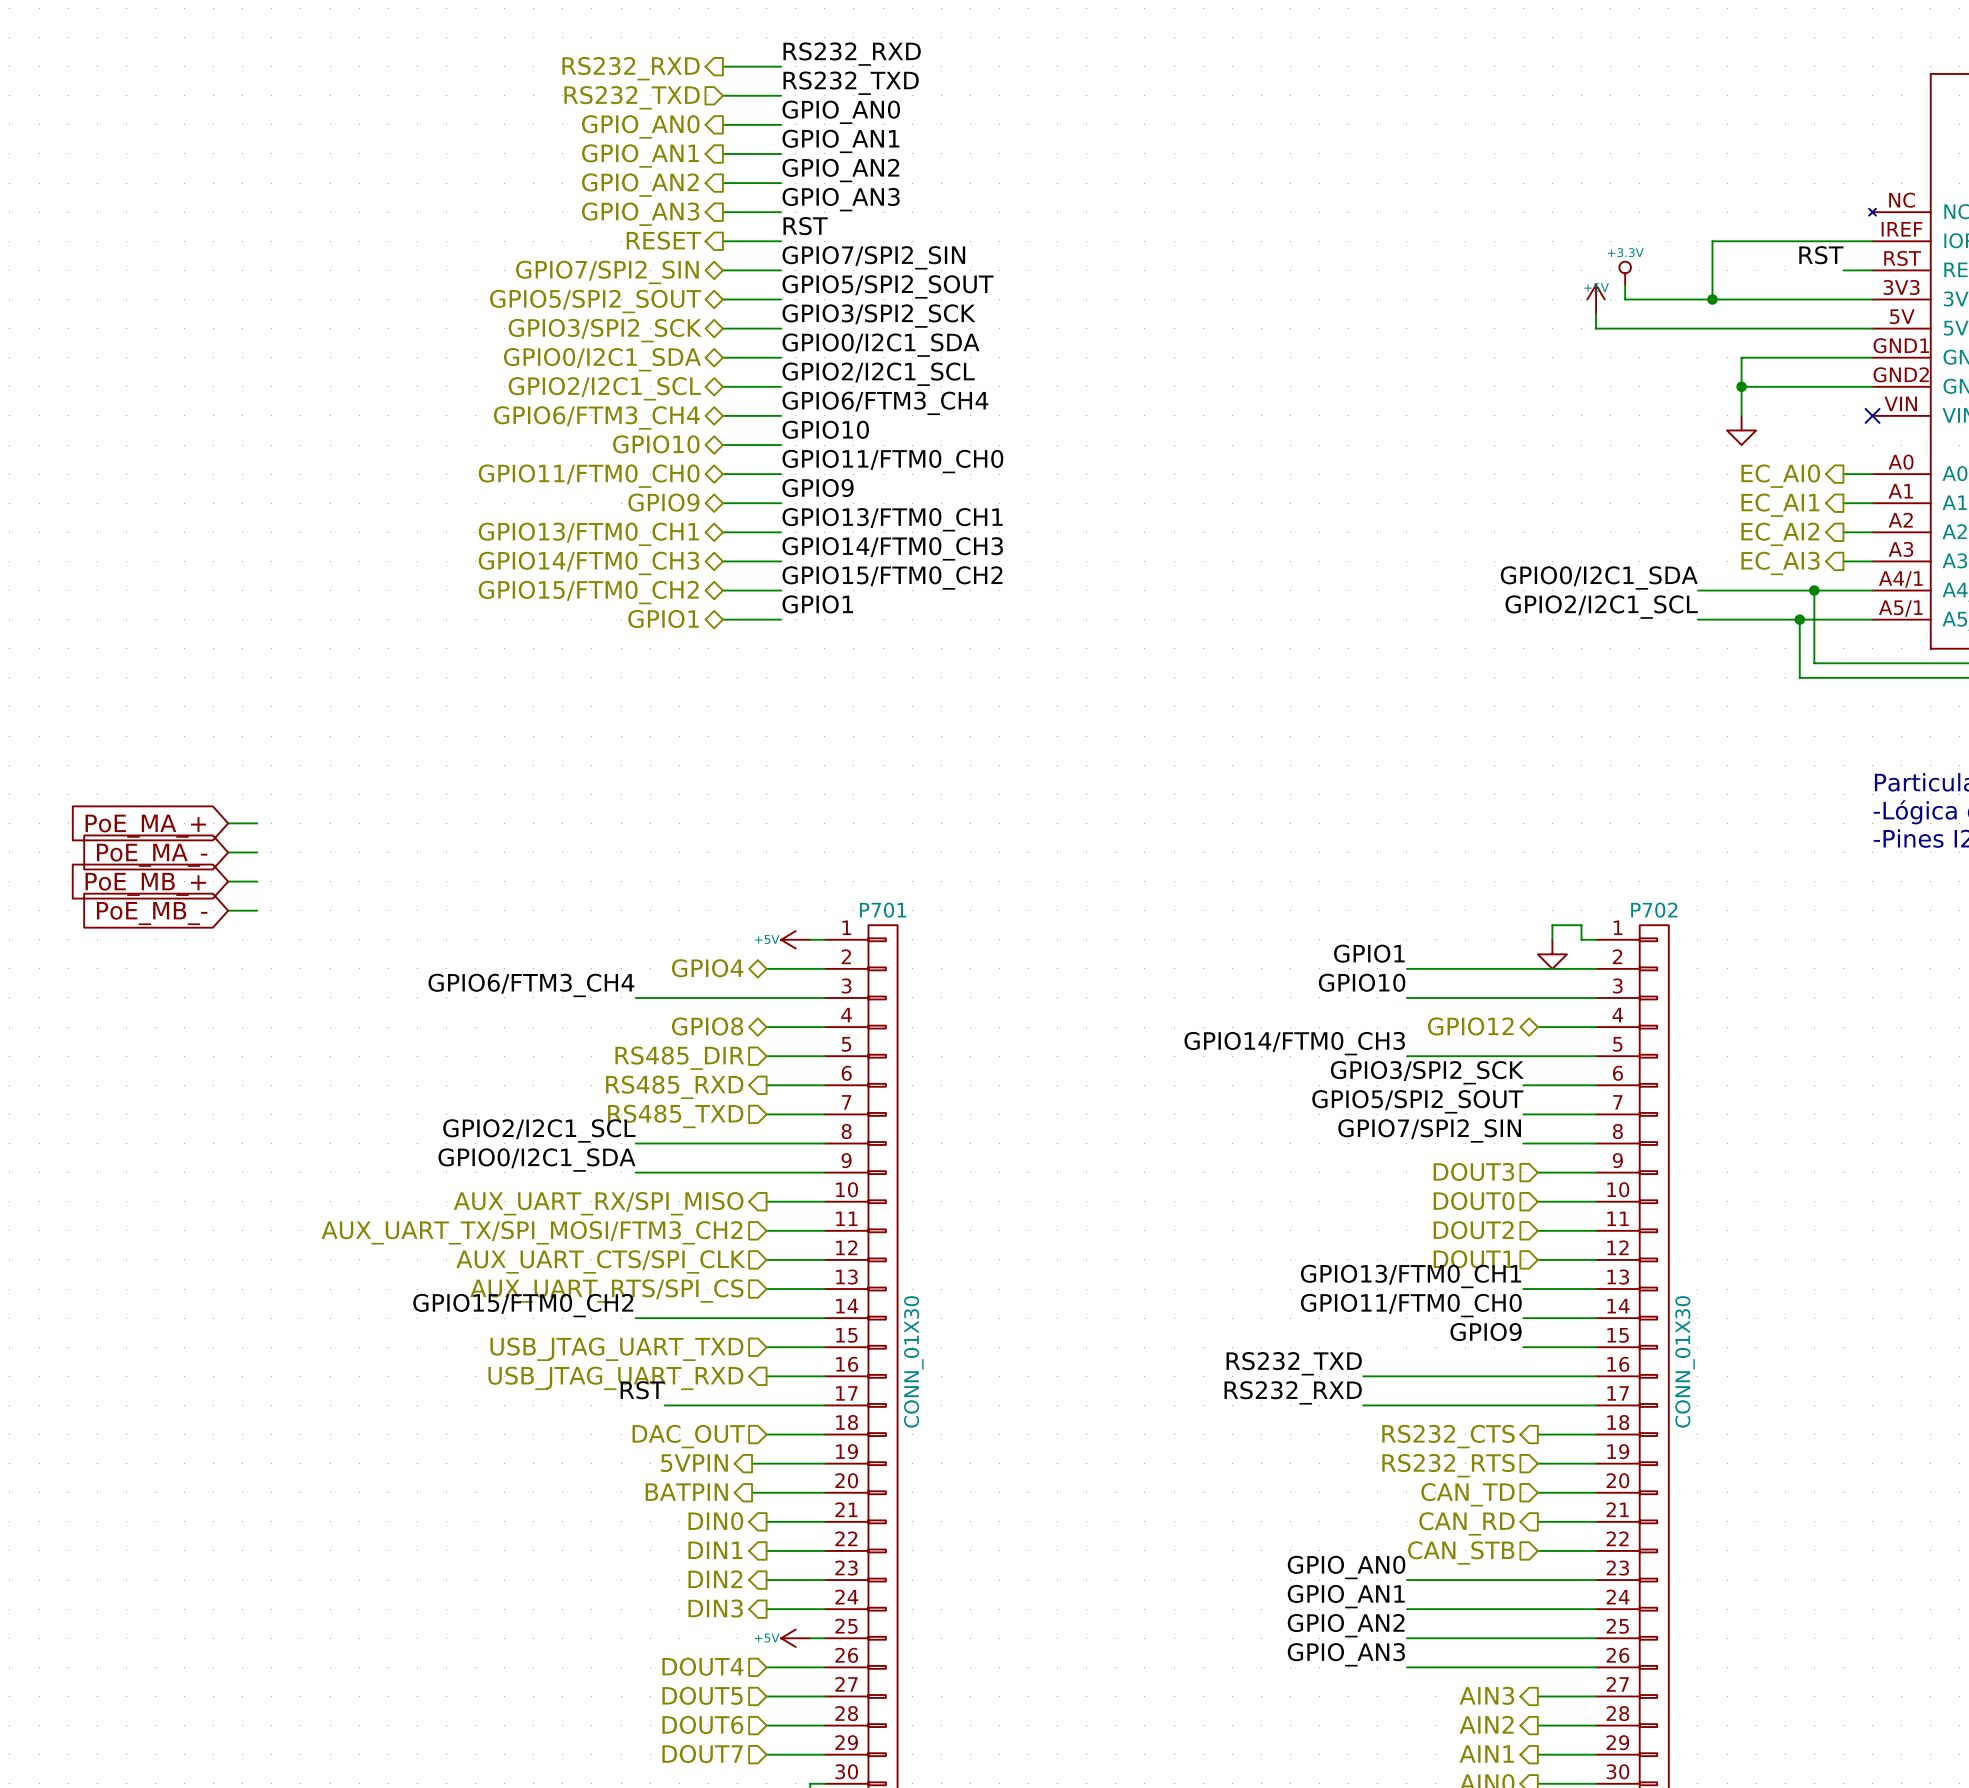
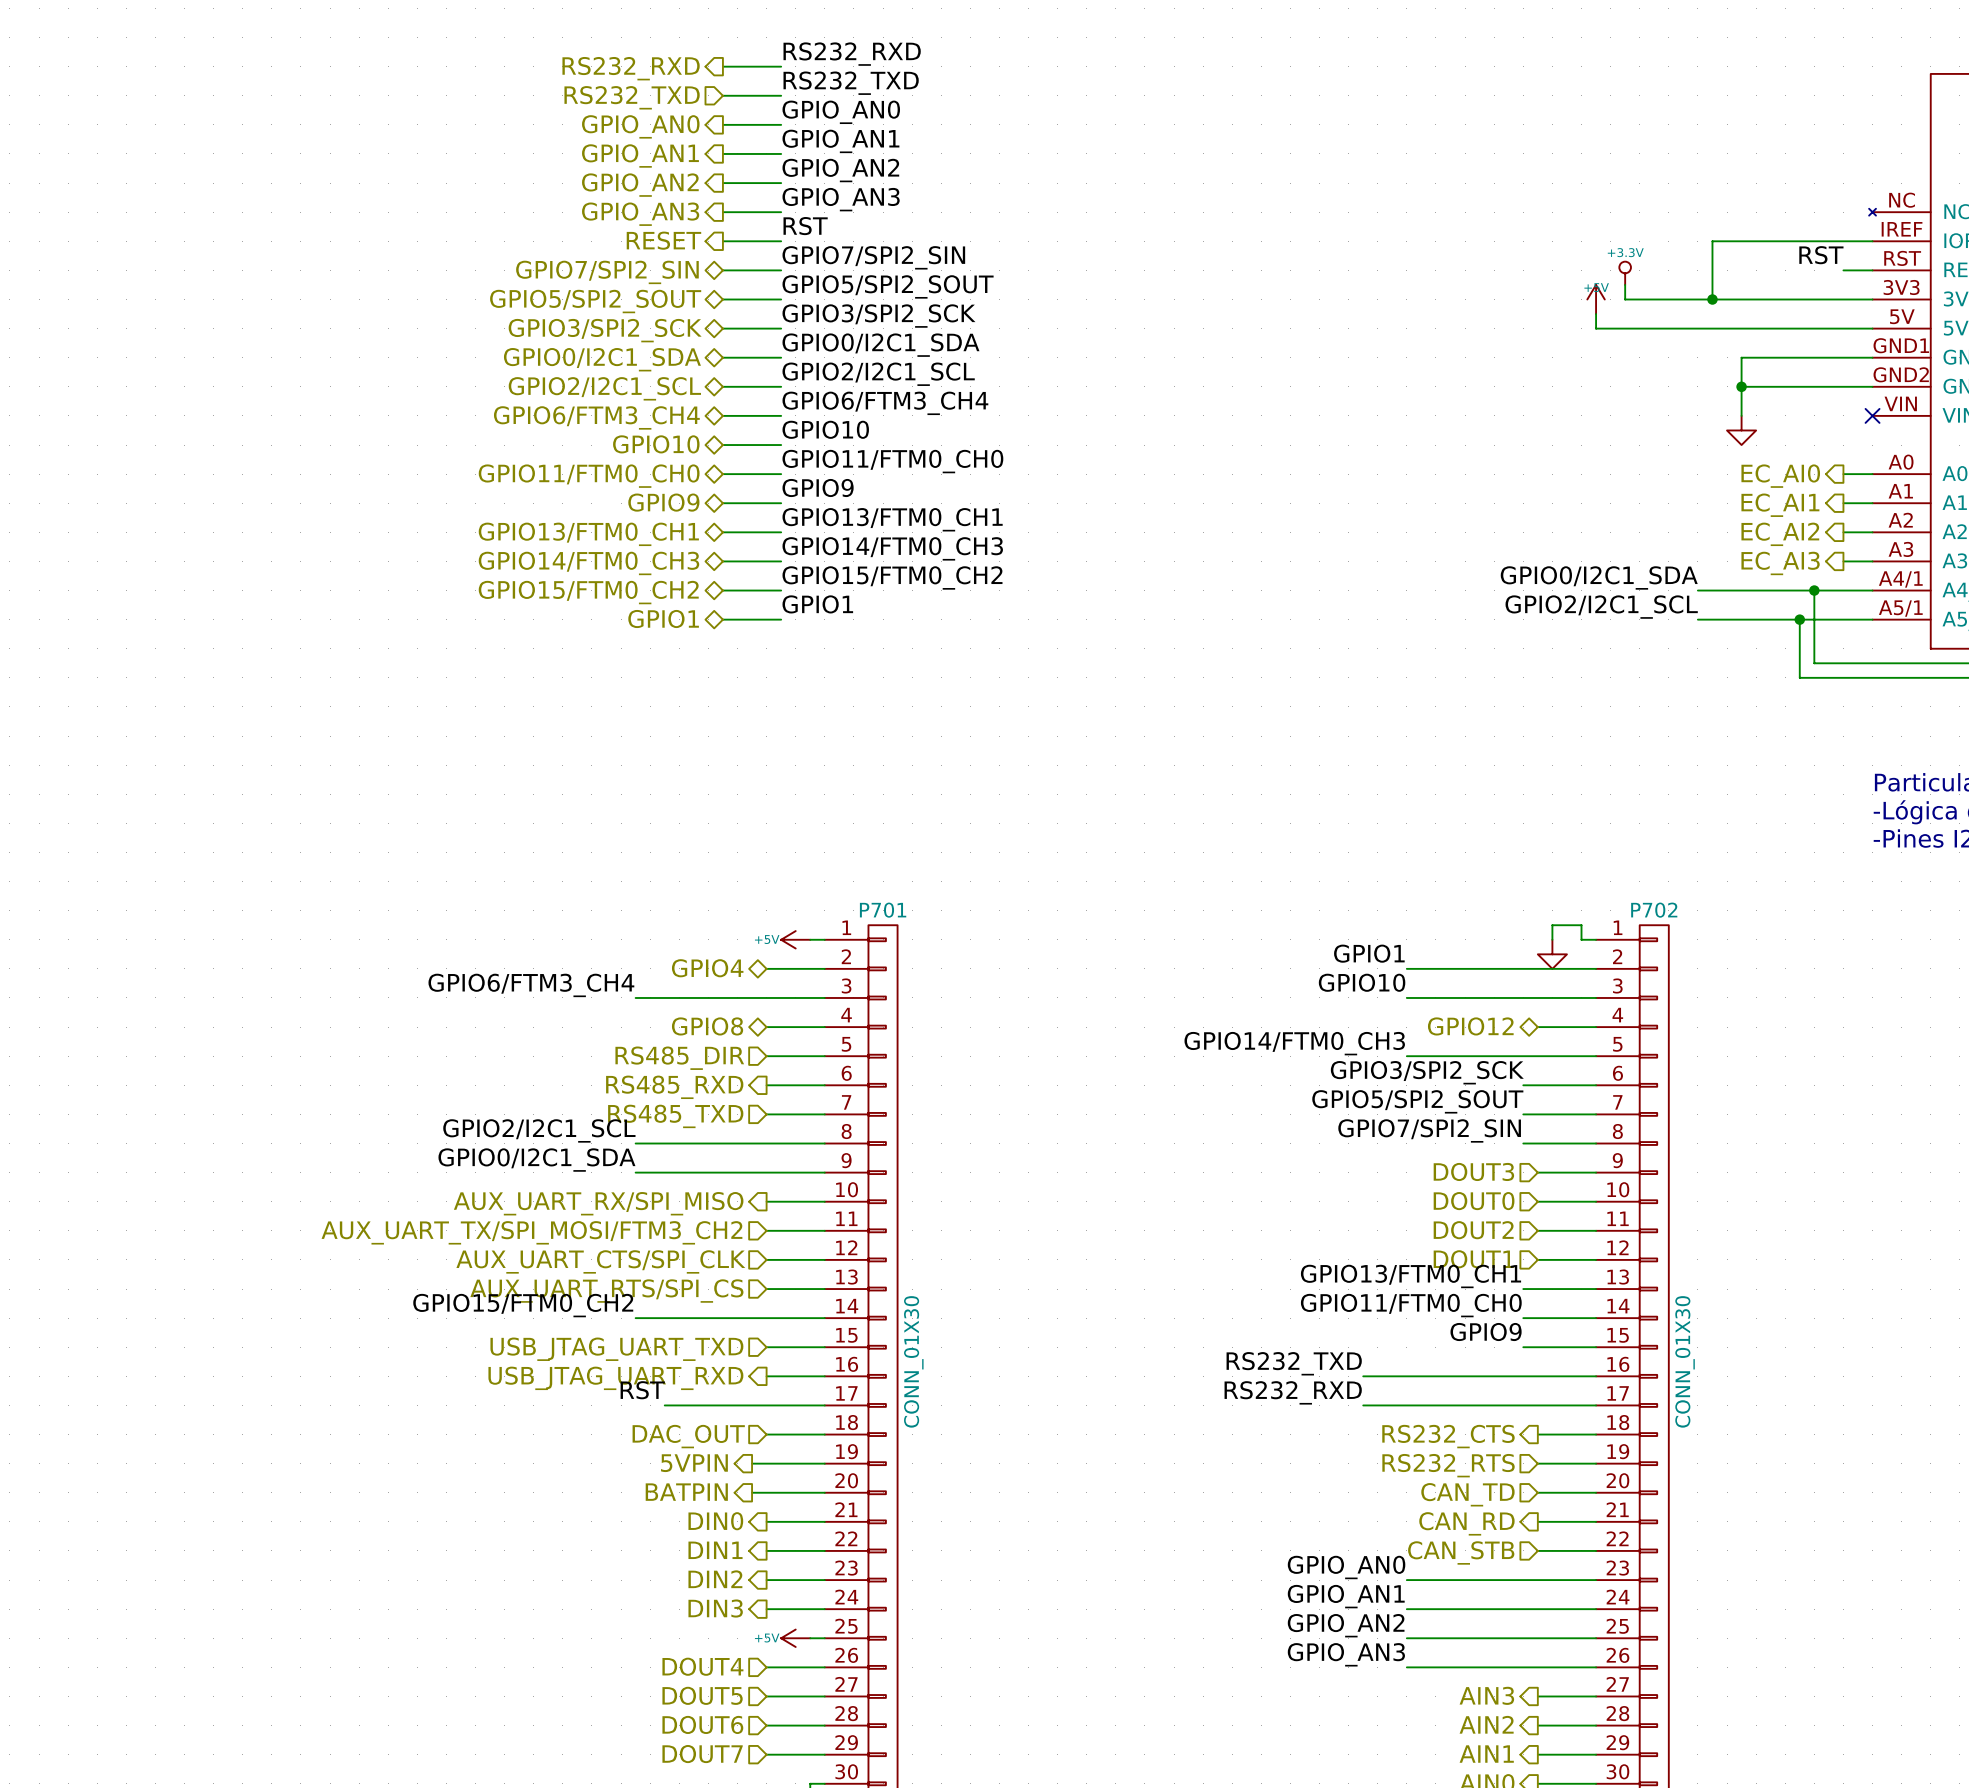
wire: (228, 823) (257, 823) -> none
global label: PoE_MA_+ (145, 826) -> none
wire: (228, 852) (257, 852) -> none
global label: PoE_MA_- (152, 855) -> none
wire: (228, 881) (257, 881) -> none
global label: PoE_MB_+ (145, 884) -> none
wire: (228, 910) (257, 910) -> none
global label: PoE_MB_- (152, 913) -> none

